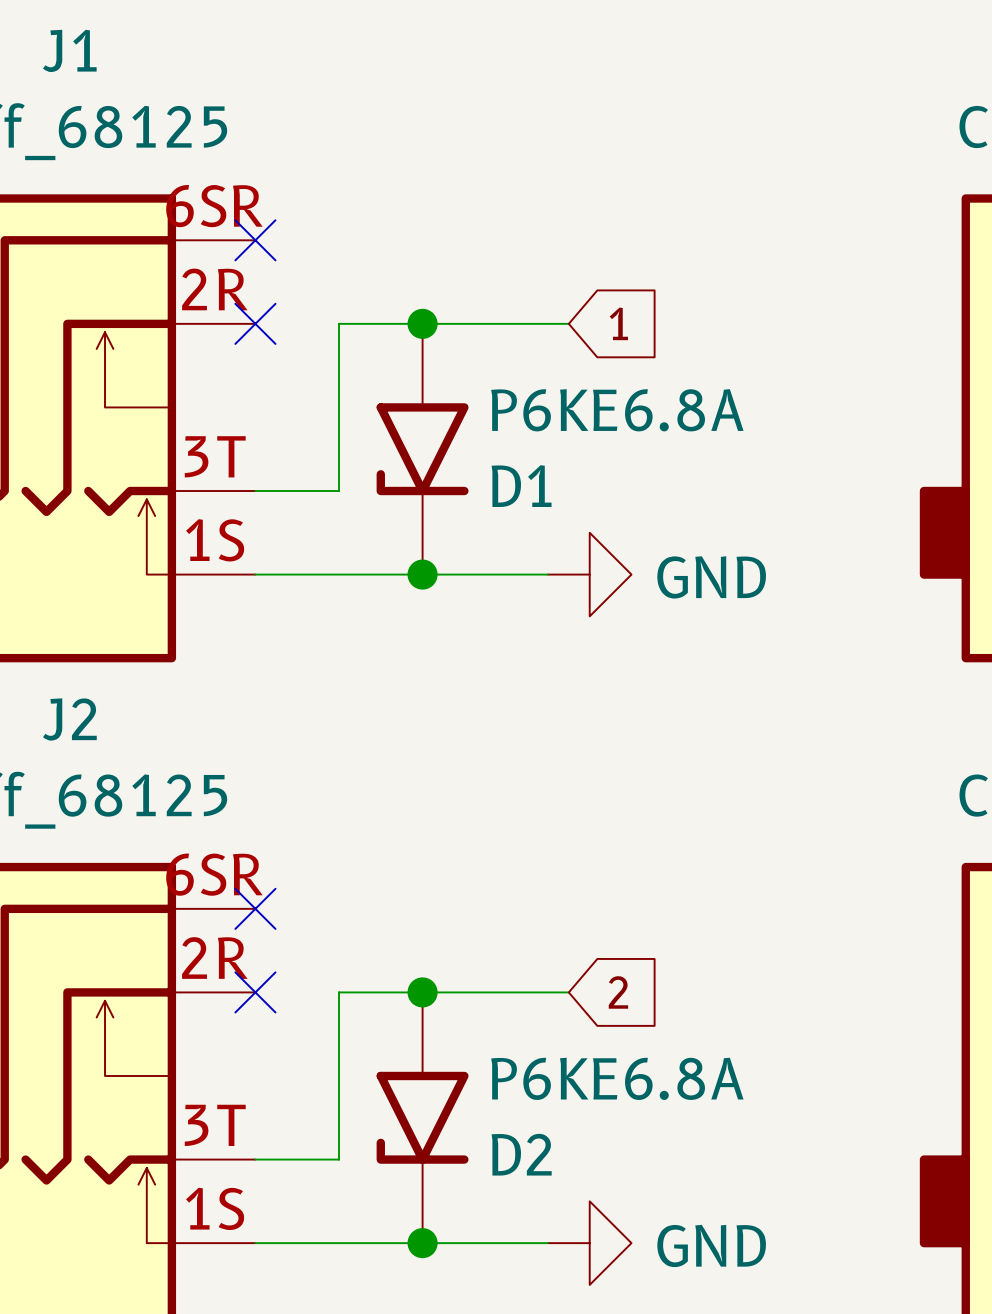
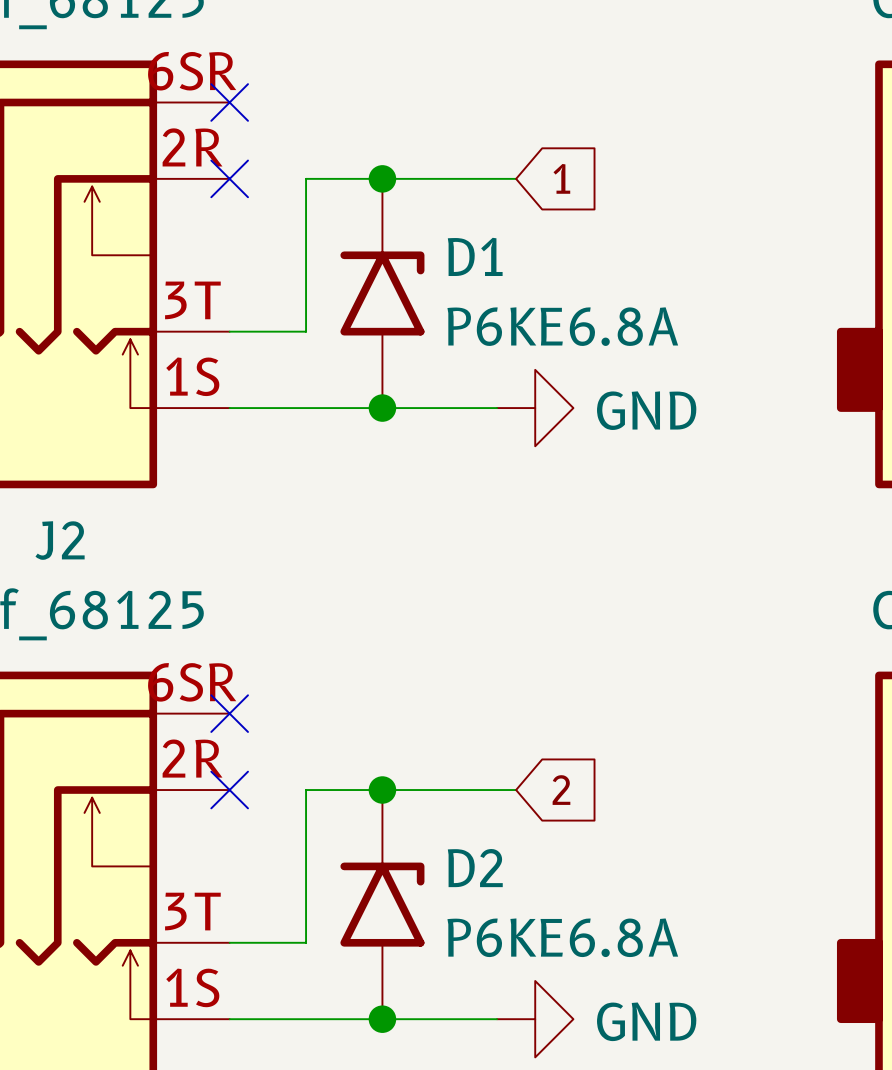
D1 value position: P6KE6.8A (617, 410) -> P6KE6.8A (562, 326)
D1 rotation: 0° (422, 449) -> 180° (382, 293)
D1 name position: D1 (521, 486) -> D1 (475, 256)
D2 value position: P6KE6.8A (617, 1078) -> P6KE6.8A (562, 937)
D2 rotation: 0° (422, 1117) -> 180° (382, 904)
D2 name position: D2 (521, 1154) -> D2 (475, 868)

